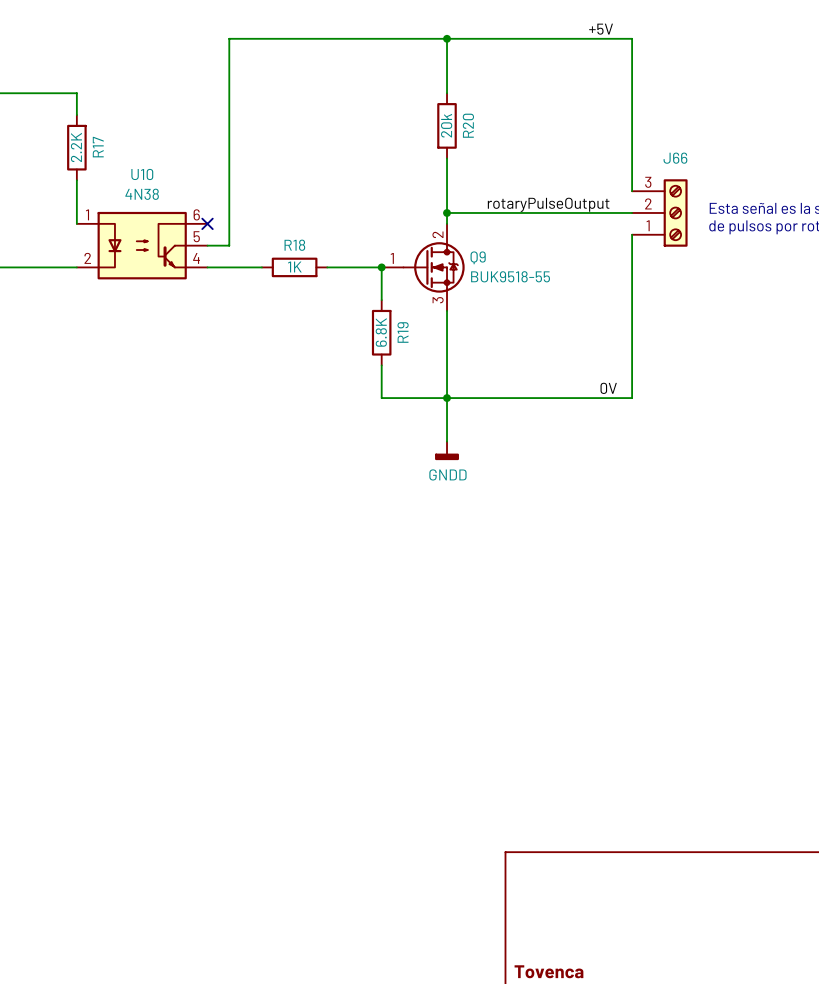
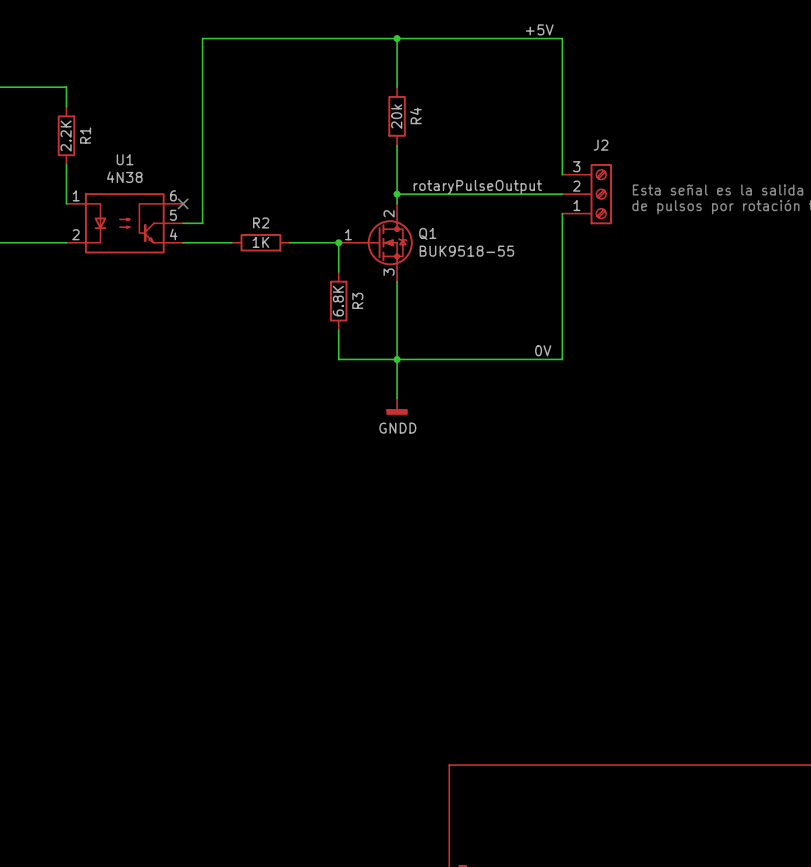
R20 name: R20 (468, 125) -> R4 (415, 115)
R17 name: R17 (98, 147) -> R1 (85, 135)
J66 name: J66 (675, 158) -> J2 (601, 145)
U10 name: U10 (142, 174) -> U1 (125, 159)
R18 name: R18 (294, 245) -> R2 (261, 222)
Q9 name: Q9 (478, 257) -> Q1 (427, 233)
R19 name: R19 (403, 332) -> R3 (357, 300)

